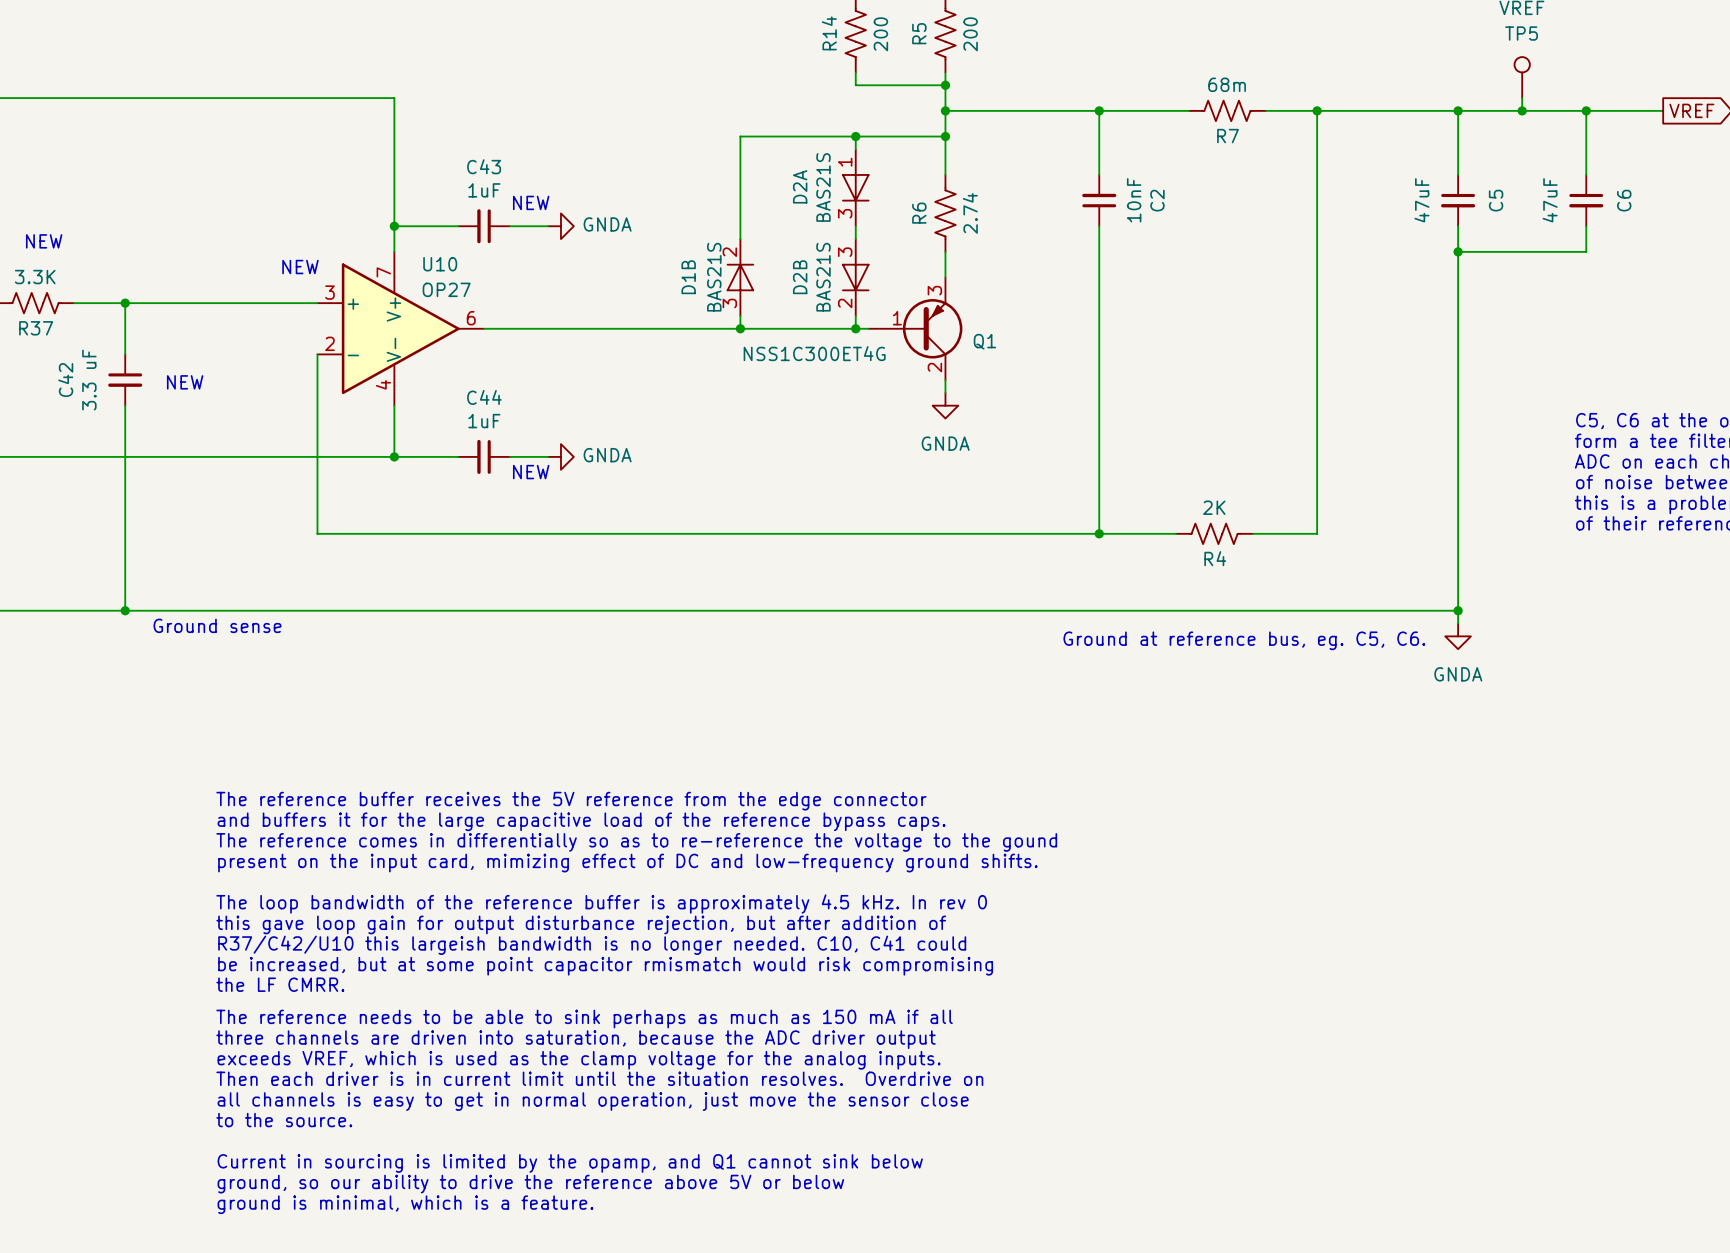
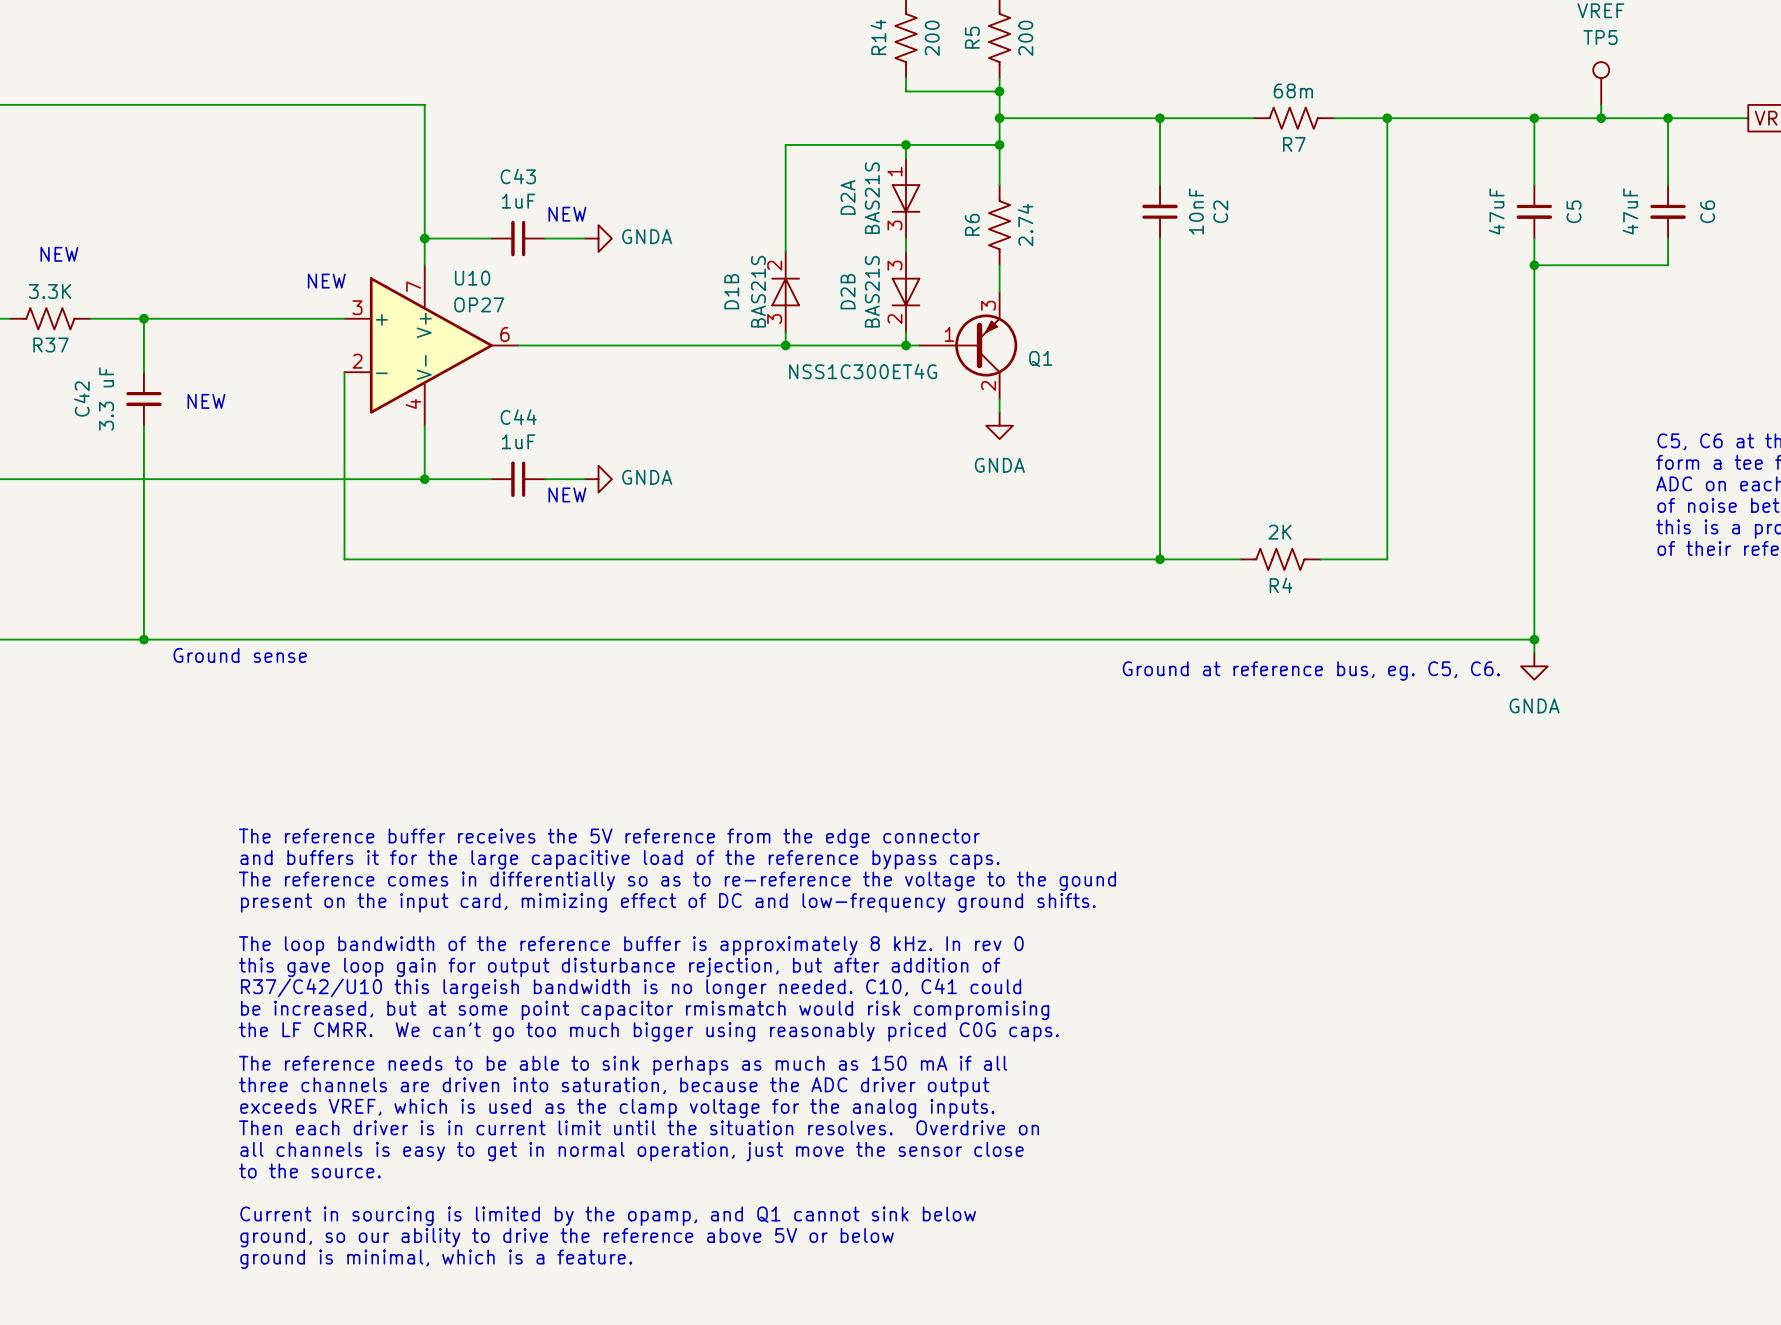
text: The loop bandwidth of the reference buffer is approximately 4.5 kHz. In rev 0 (601, 904) -> The loop bandwidth of the reference buffer is approximately 8 kHz. In rev 0 (631, 945)
text: the LF CMRR. (280, 984) -> the LF CMRR. We can't go too much bigger using reasonably priced C0G caps. (648, 1031)

